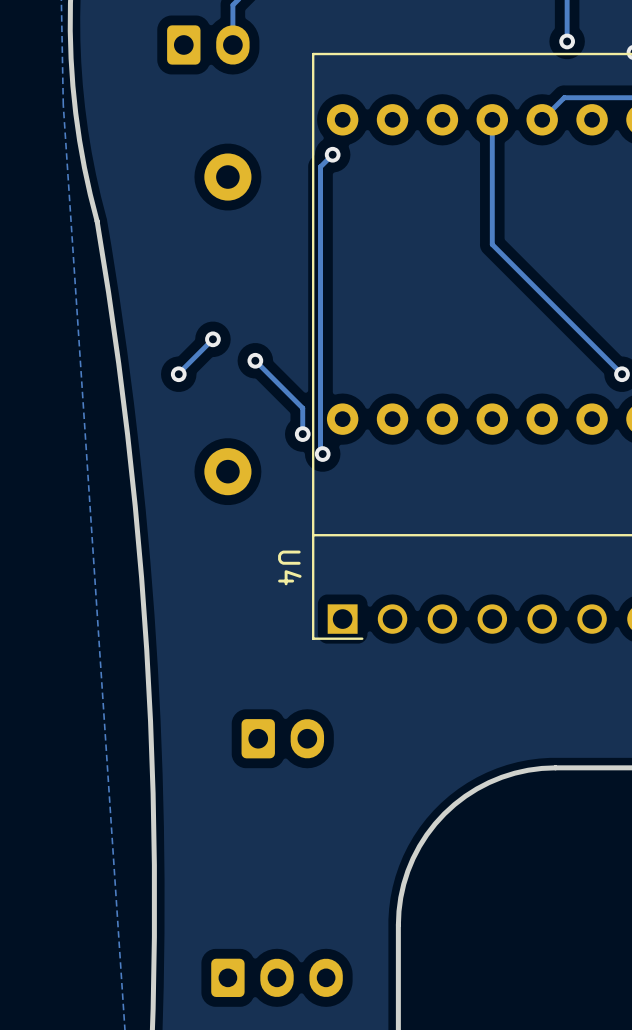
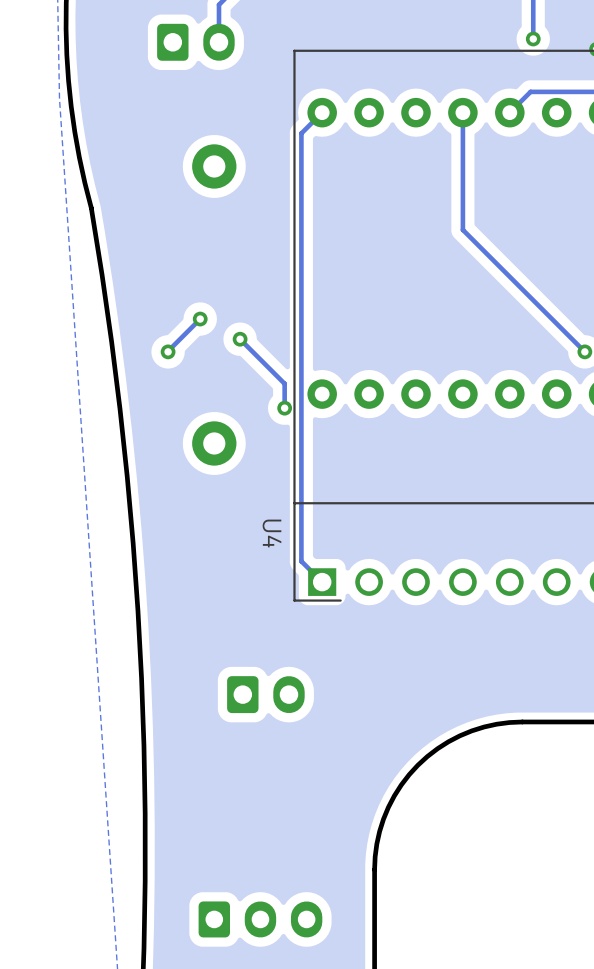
track: none -> (322, 112) (301, 133) (301, 561) (322, 582)
track: (332, 154) (320, 166) (320, 451) (322, 454) -> none
via: (332, 154) -> none
via: (322, 454) -> none

